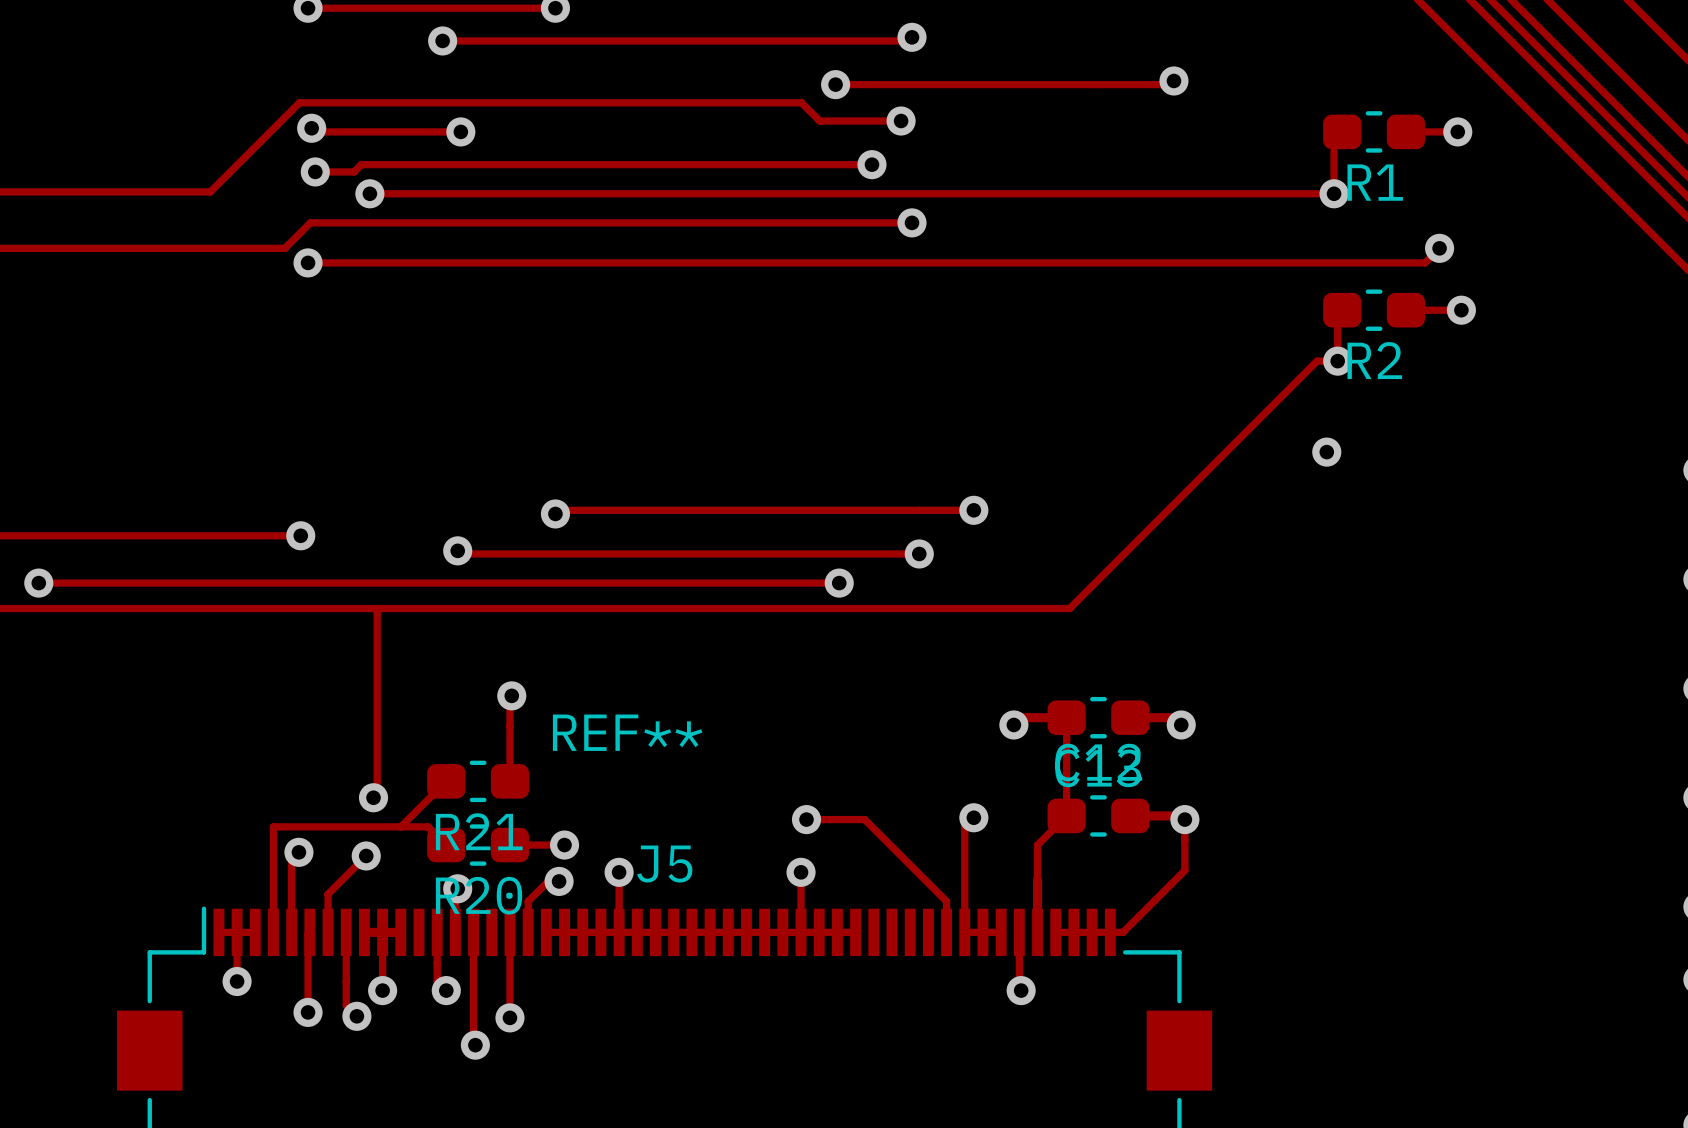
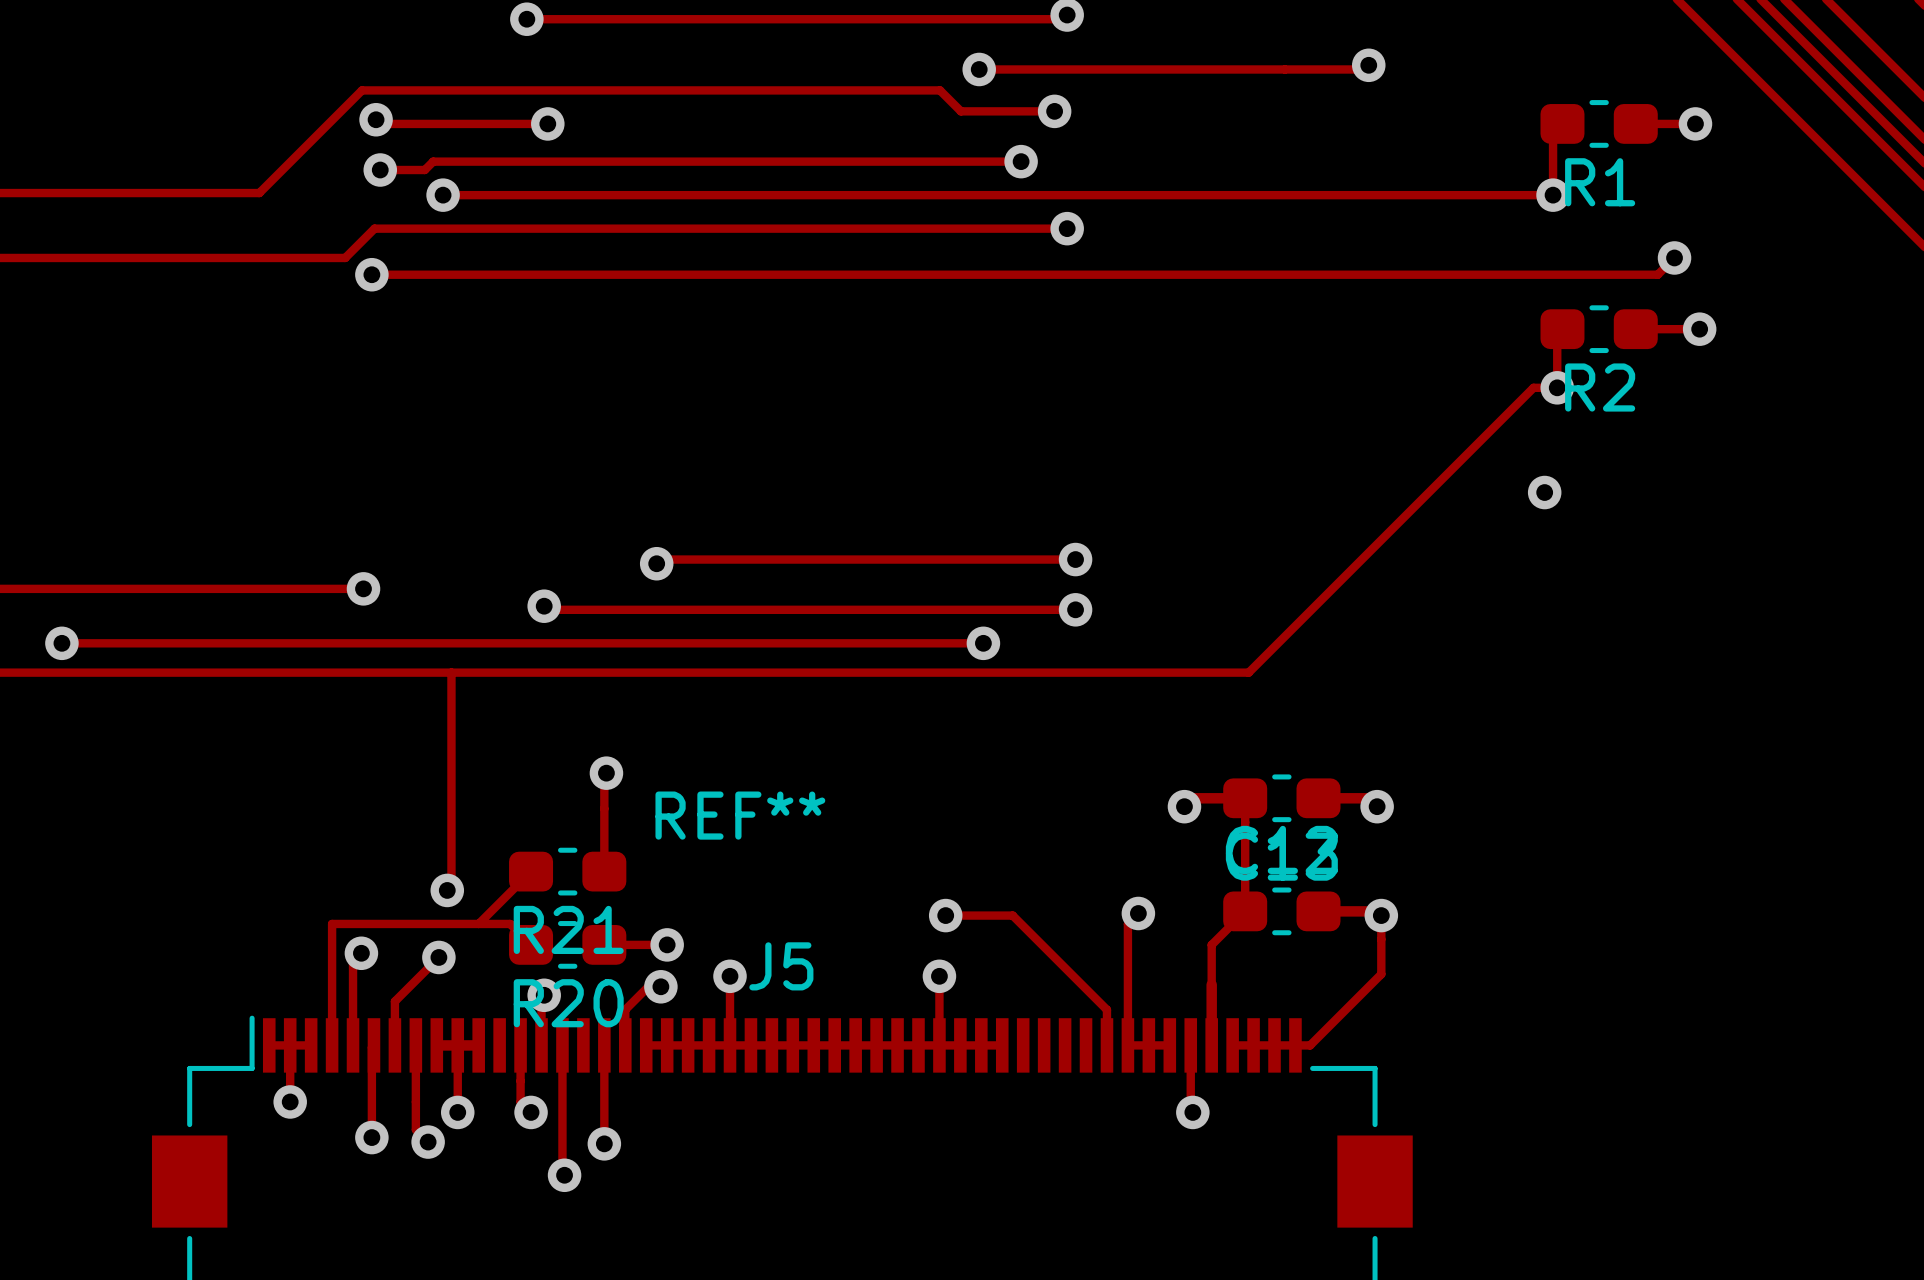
track: (919, 510) (973, 510) -> none
via position: (973, 510) -> (1075, 559)

